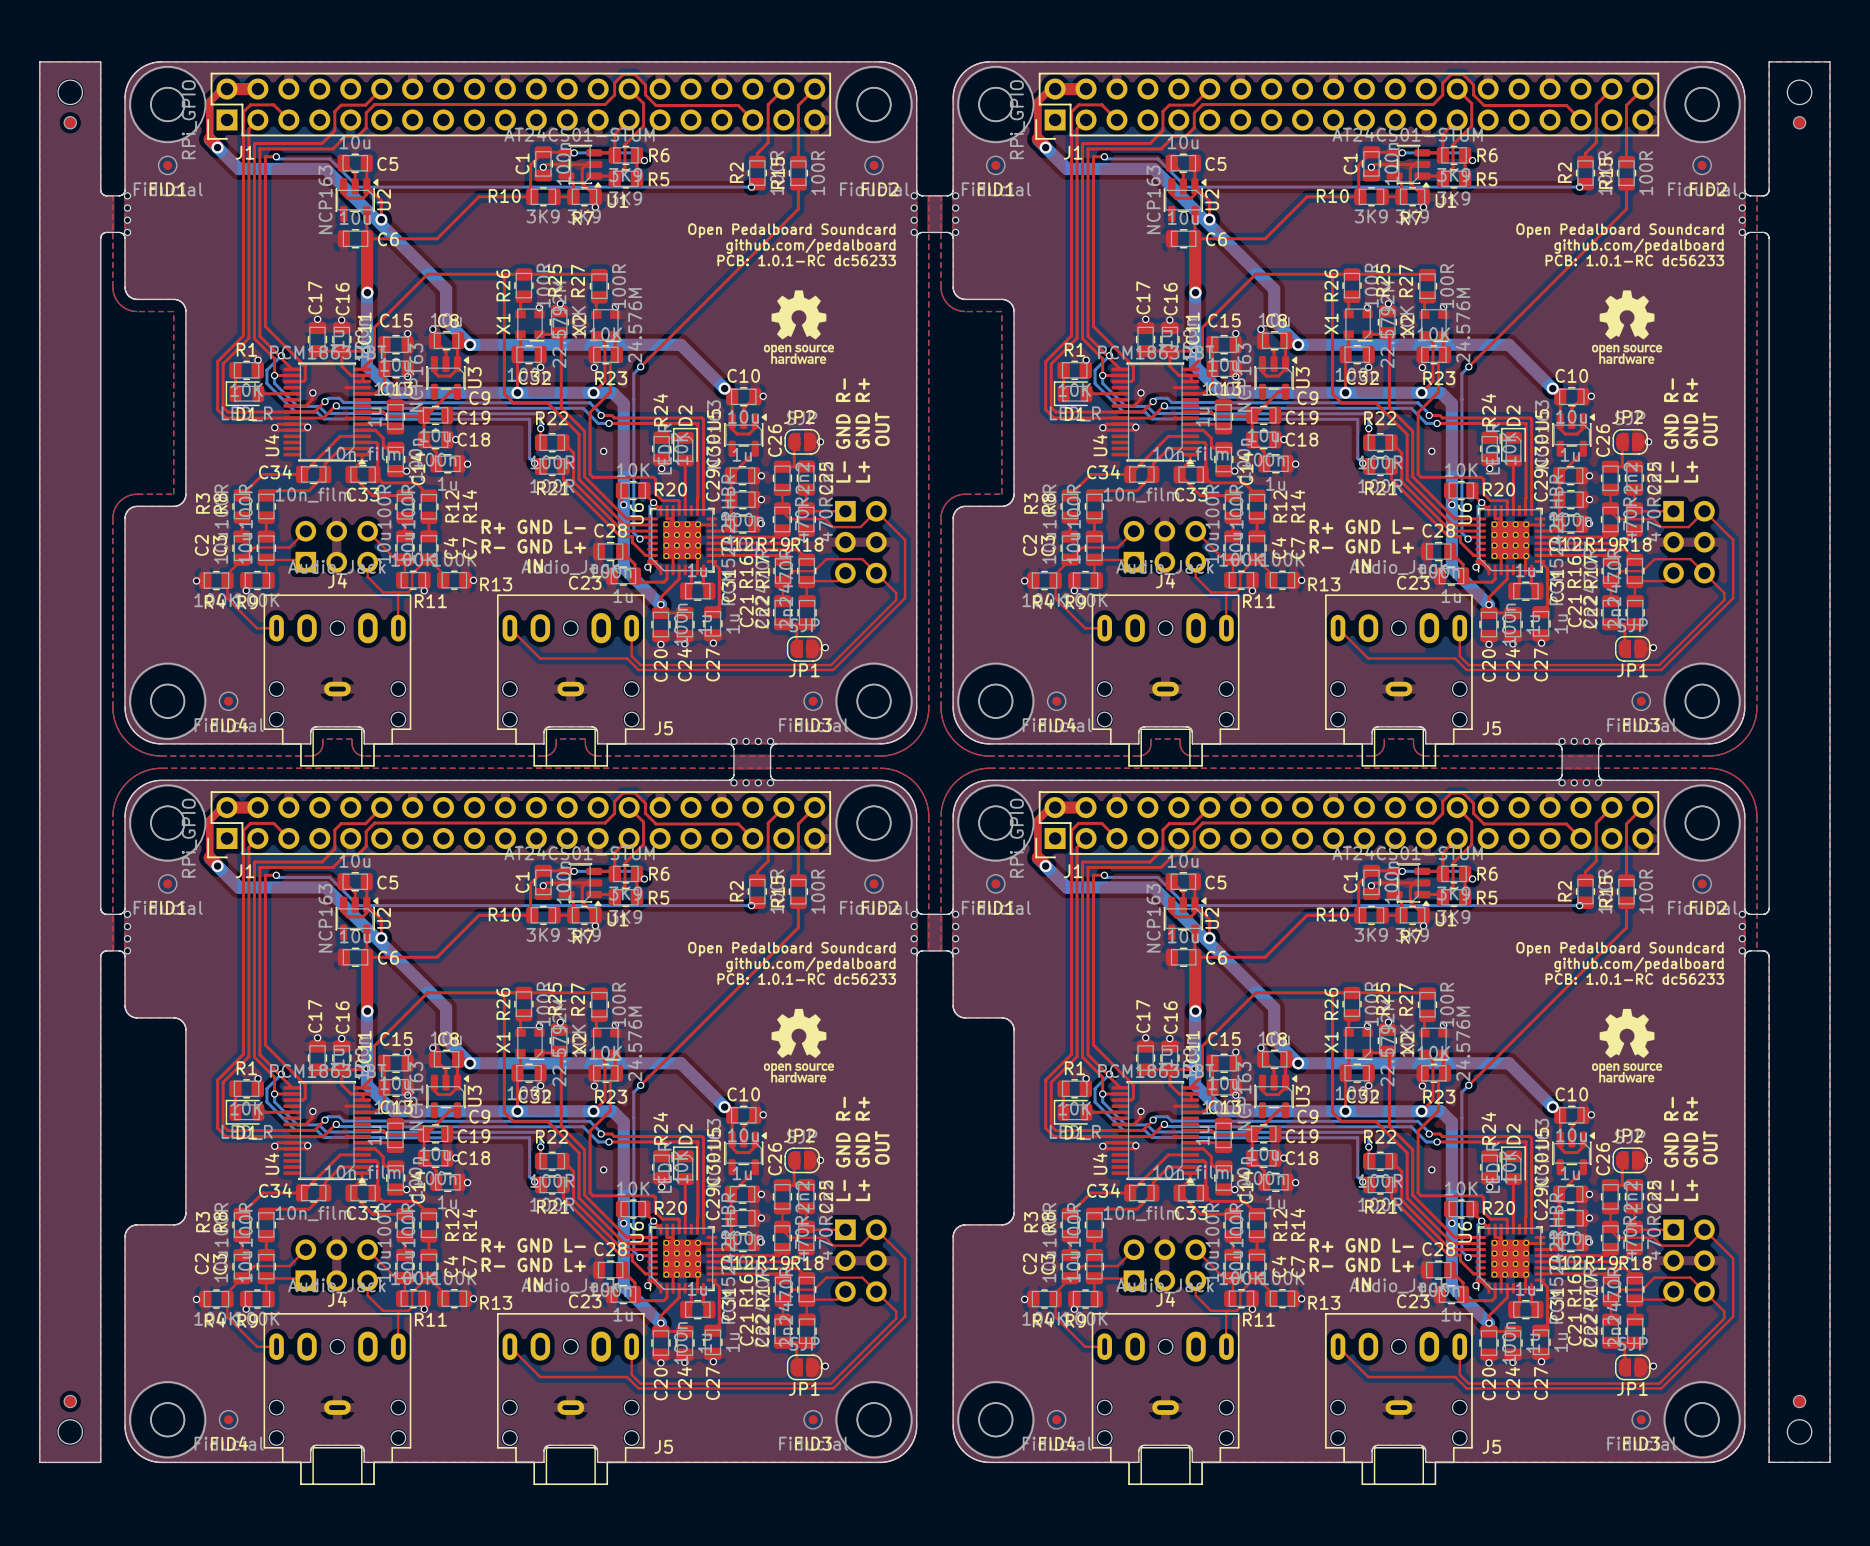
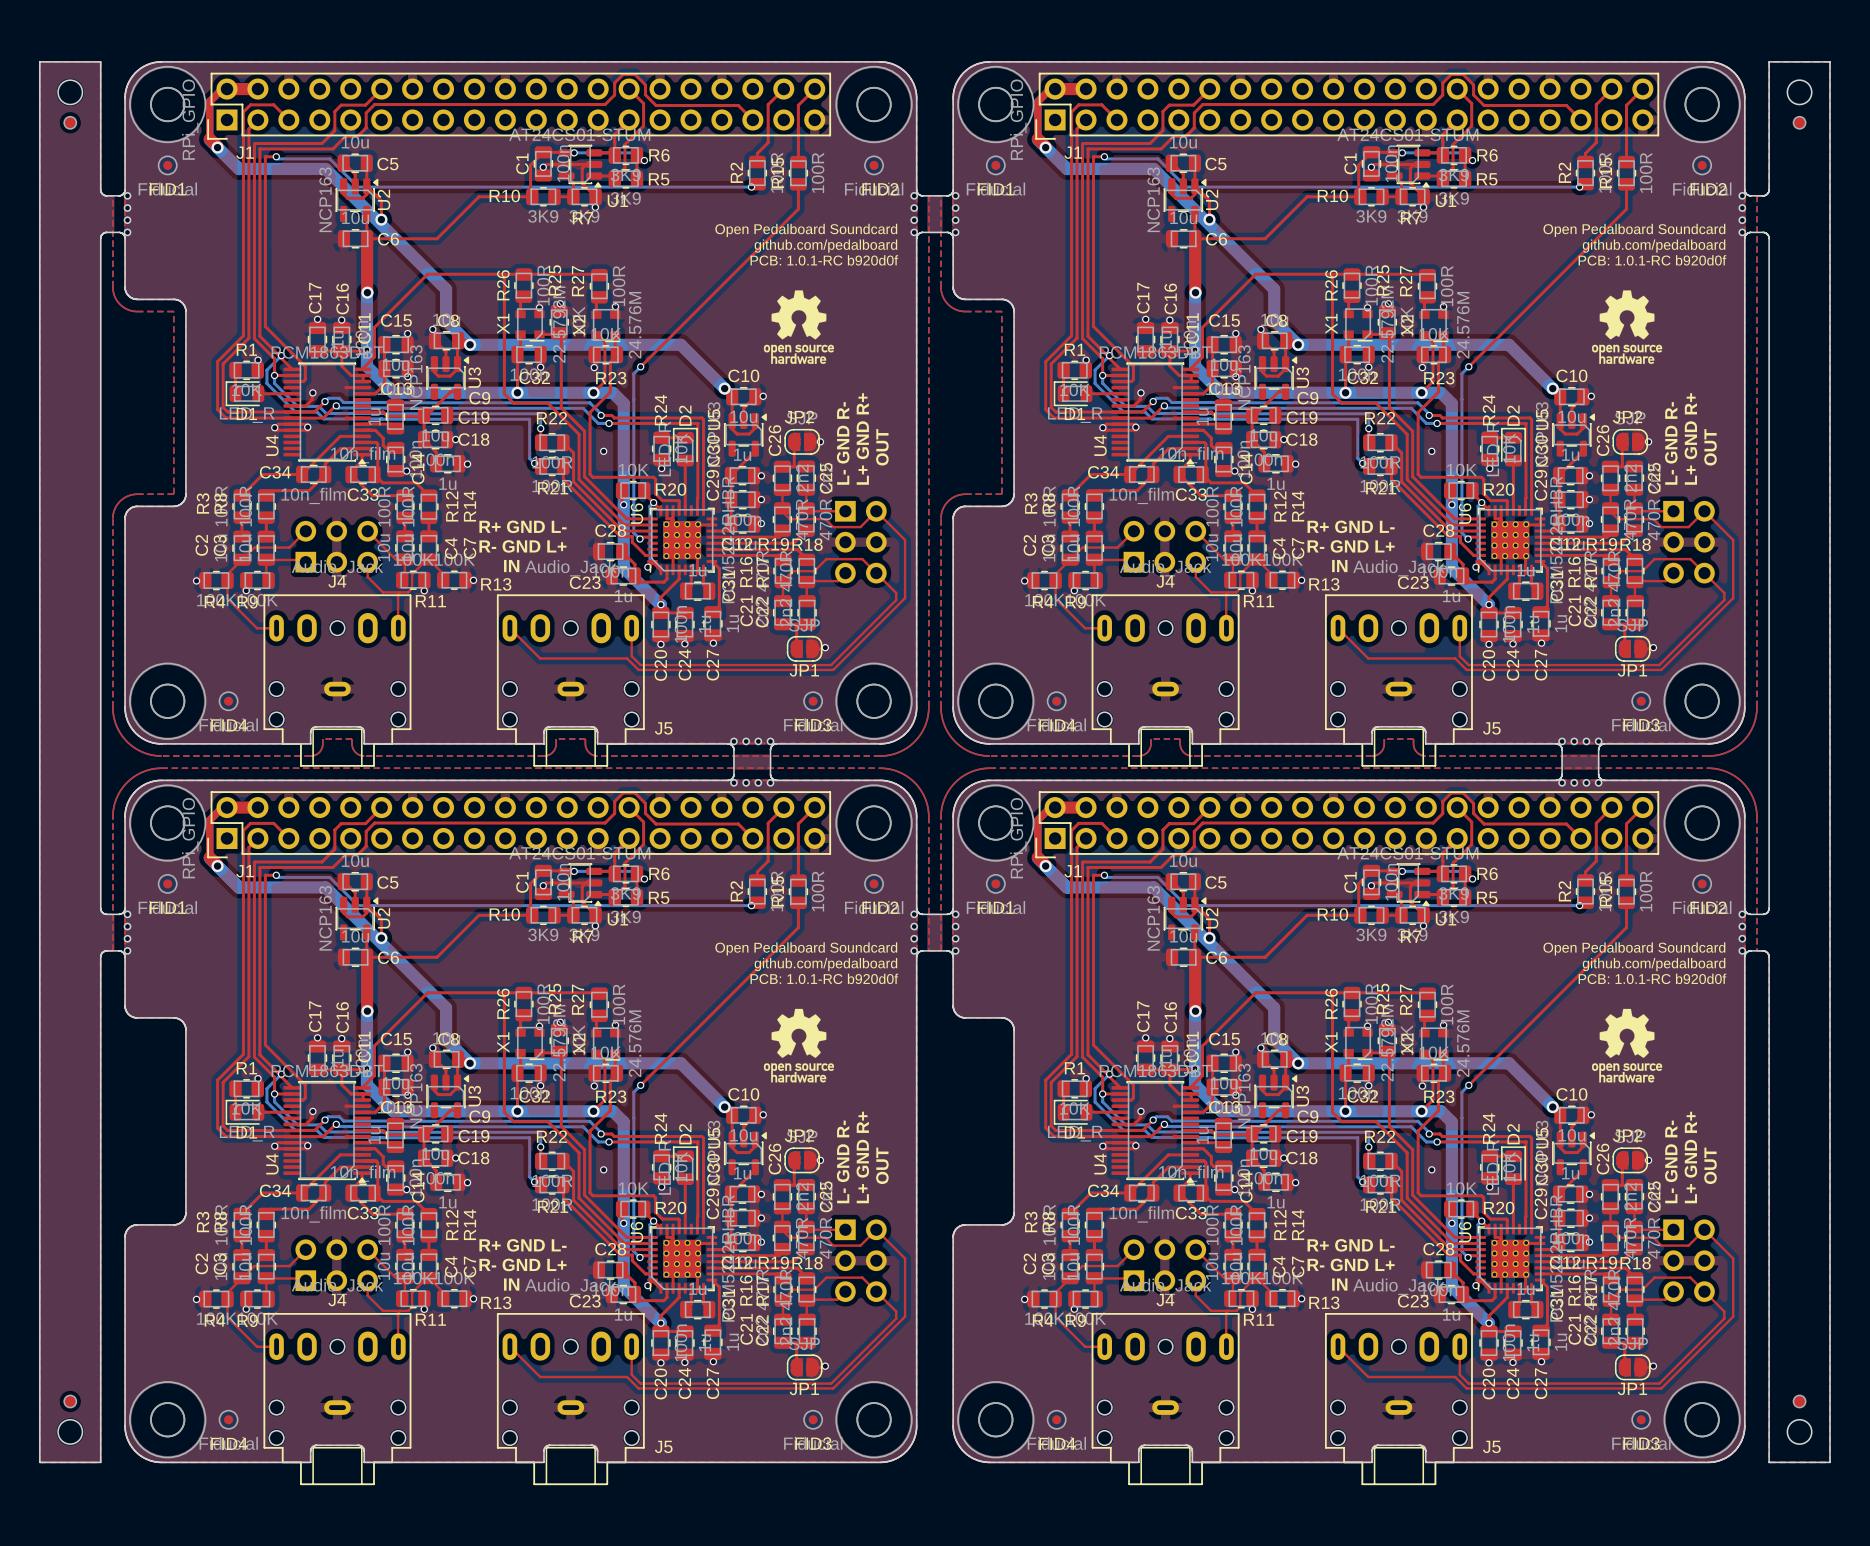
text: PCB: 1.0.1-RC dc56233 (806, 260) -> PCB: 1.0.1-RC b920d0f (824, 260)
text: PCB: 1.0.1-RC dc56233 (1634, 260) -> PCB: 1.0.1-RC b920d0f (1652, 260)
text: PCB: 1.0.1-RC dc56233 (806, 979) -> PCB: 1.0.1-RC b920d0f (824, 978)
text: PCB: 1.0.1-RC dc56233 (1634, 979) -> PCB: 1.0.1-RC b920d0f (1652, 978)

